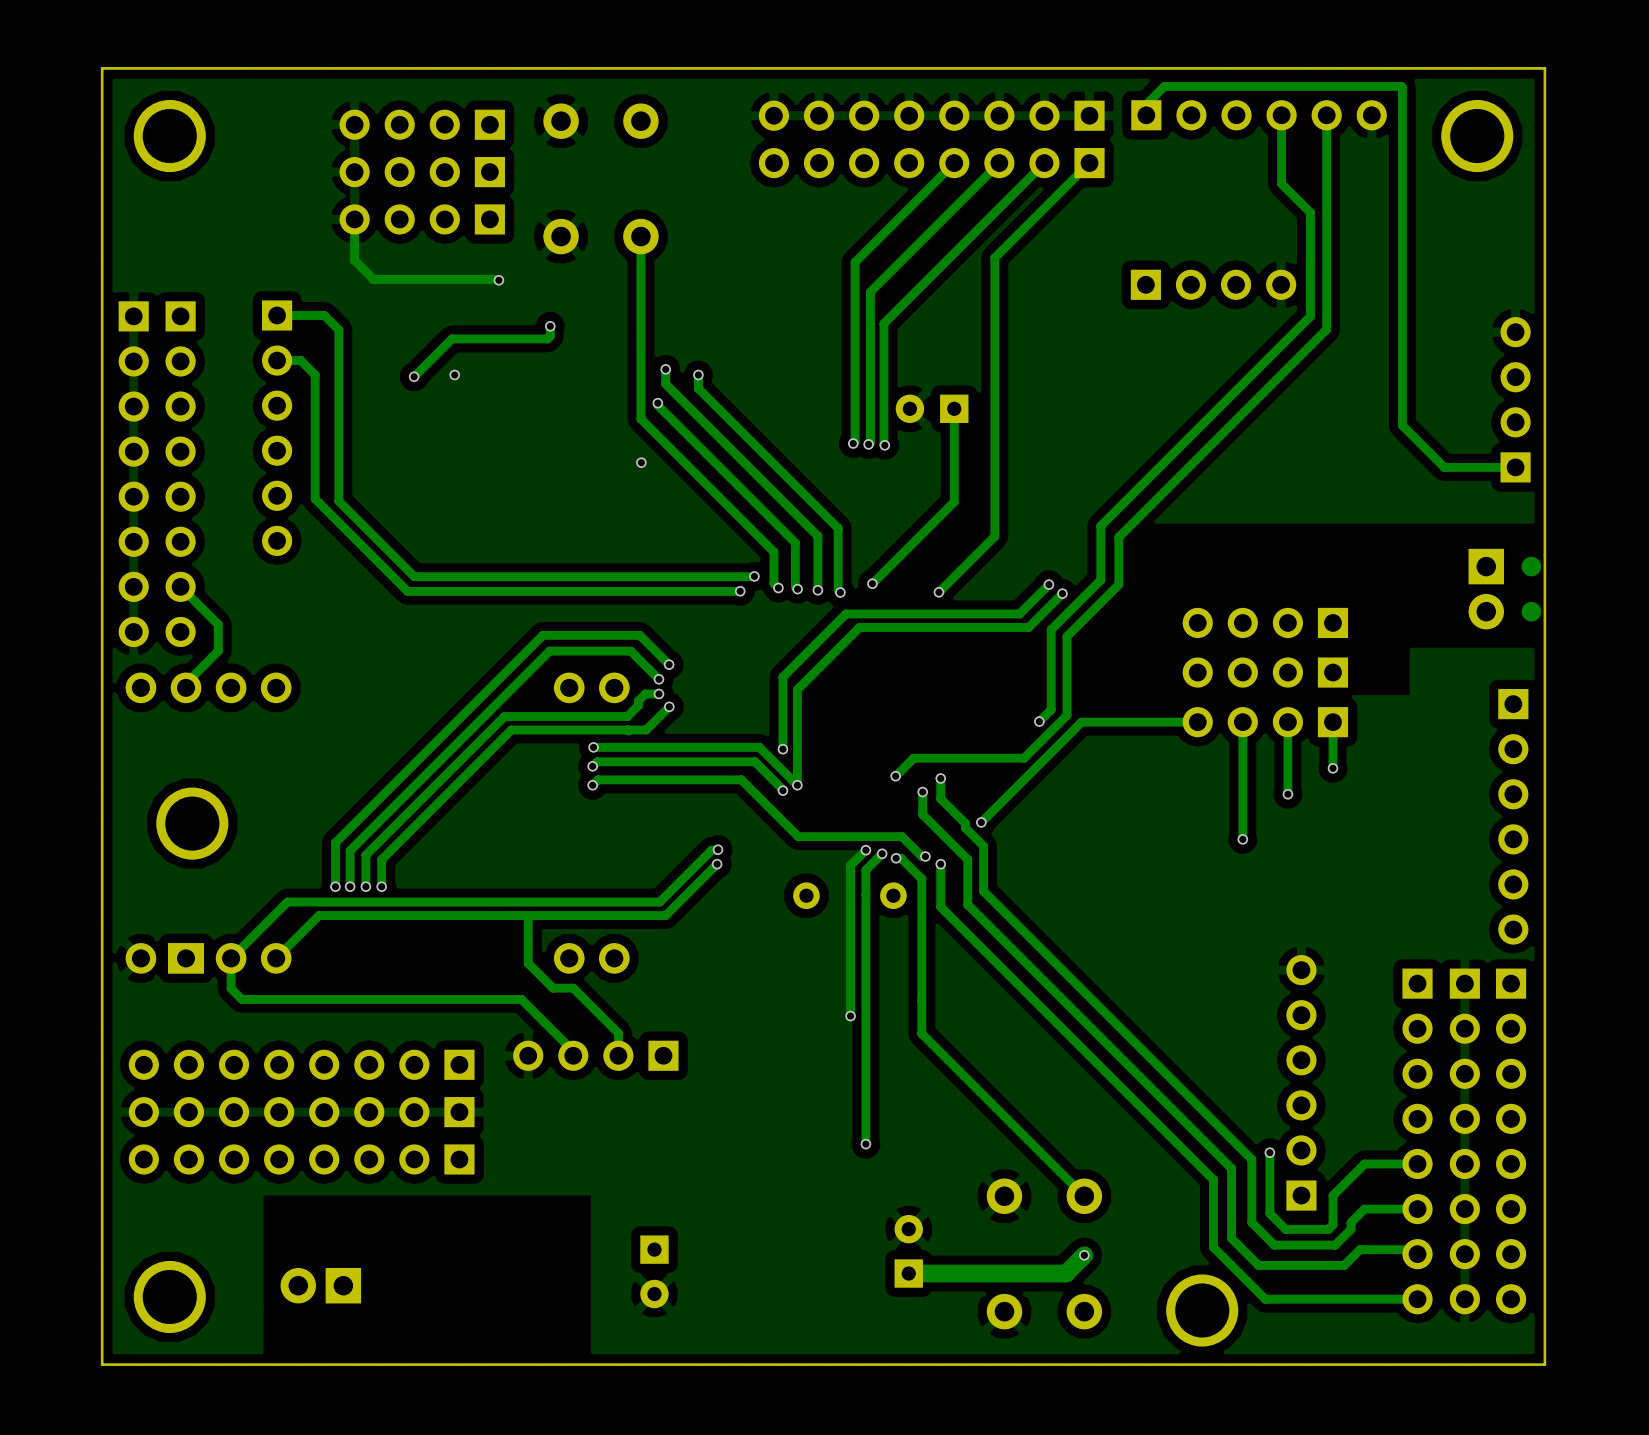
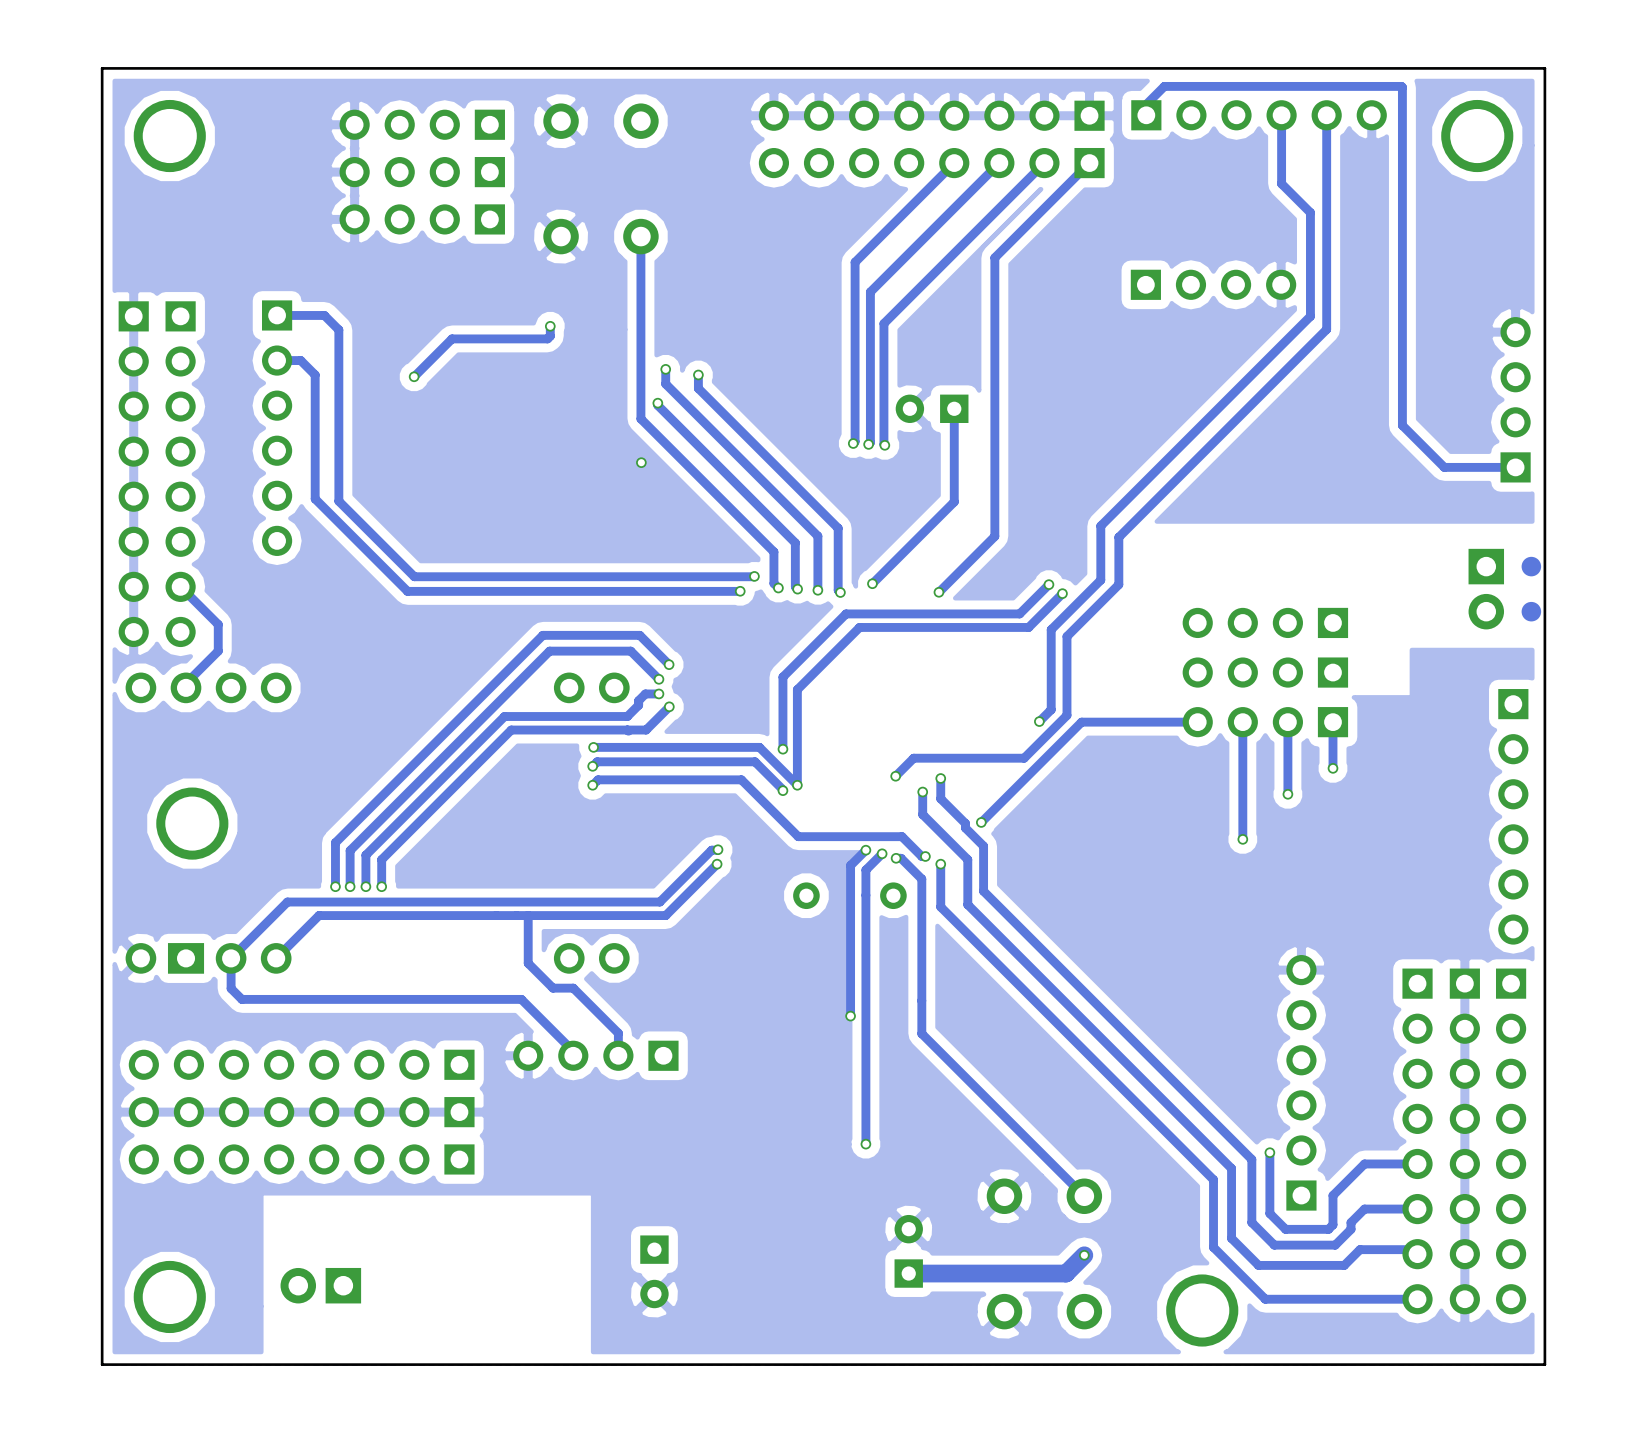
track: (354, 219) (354, 260) (373, 279) (498, 280) -> none
via: (498, 280) -> none
via: (454, 374) -> none

